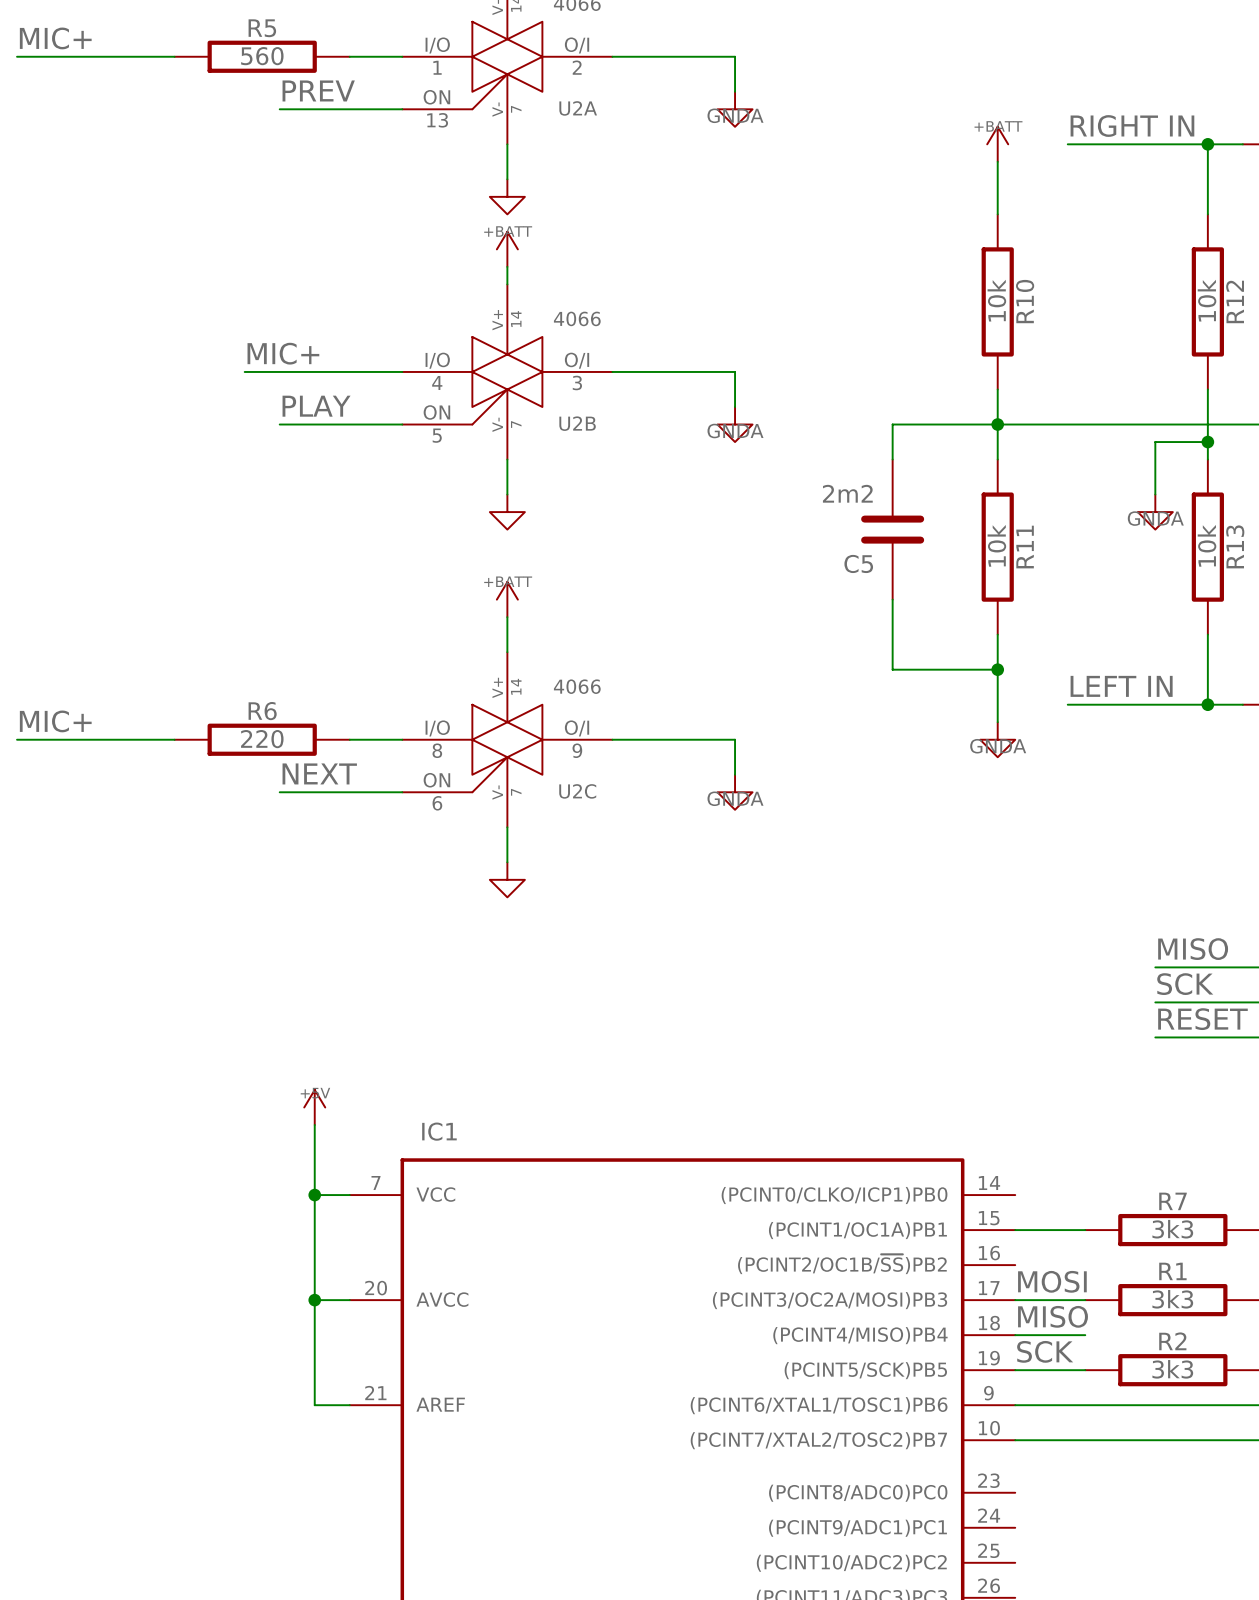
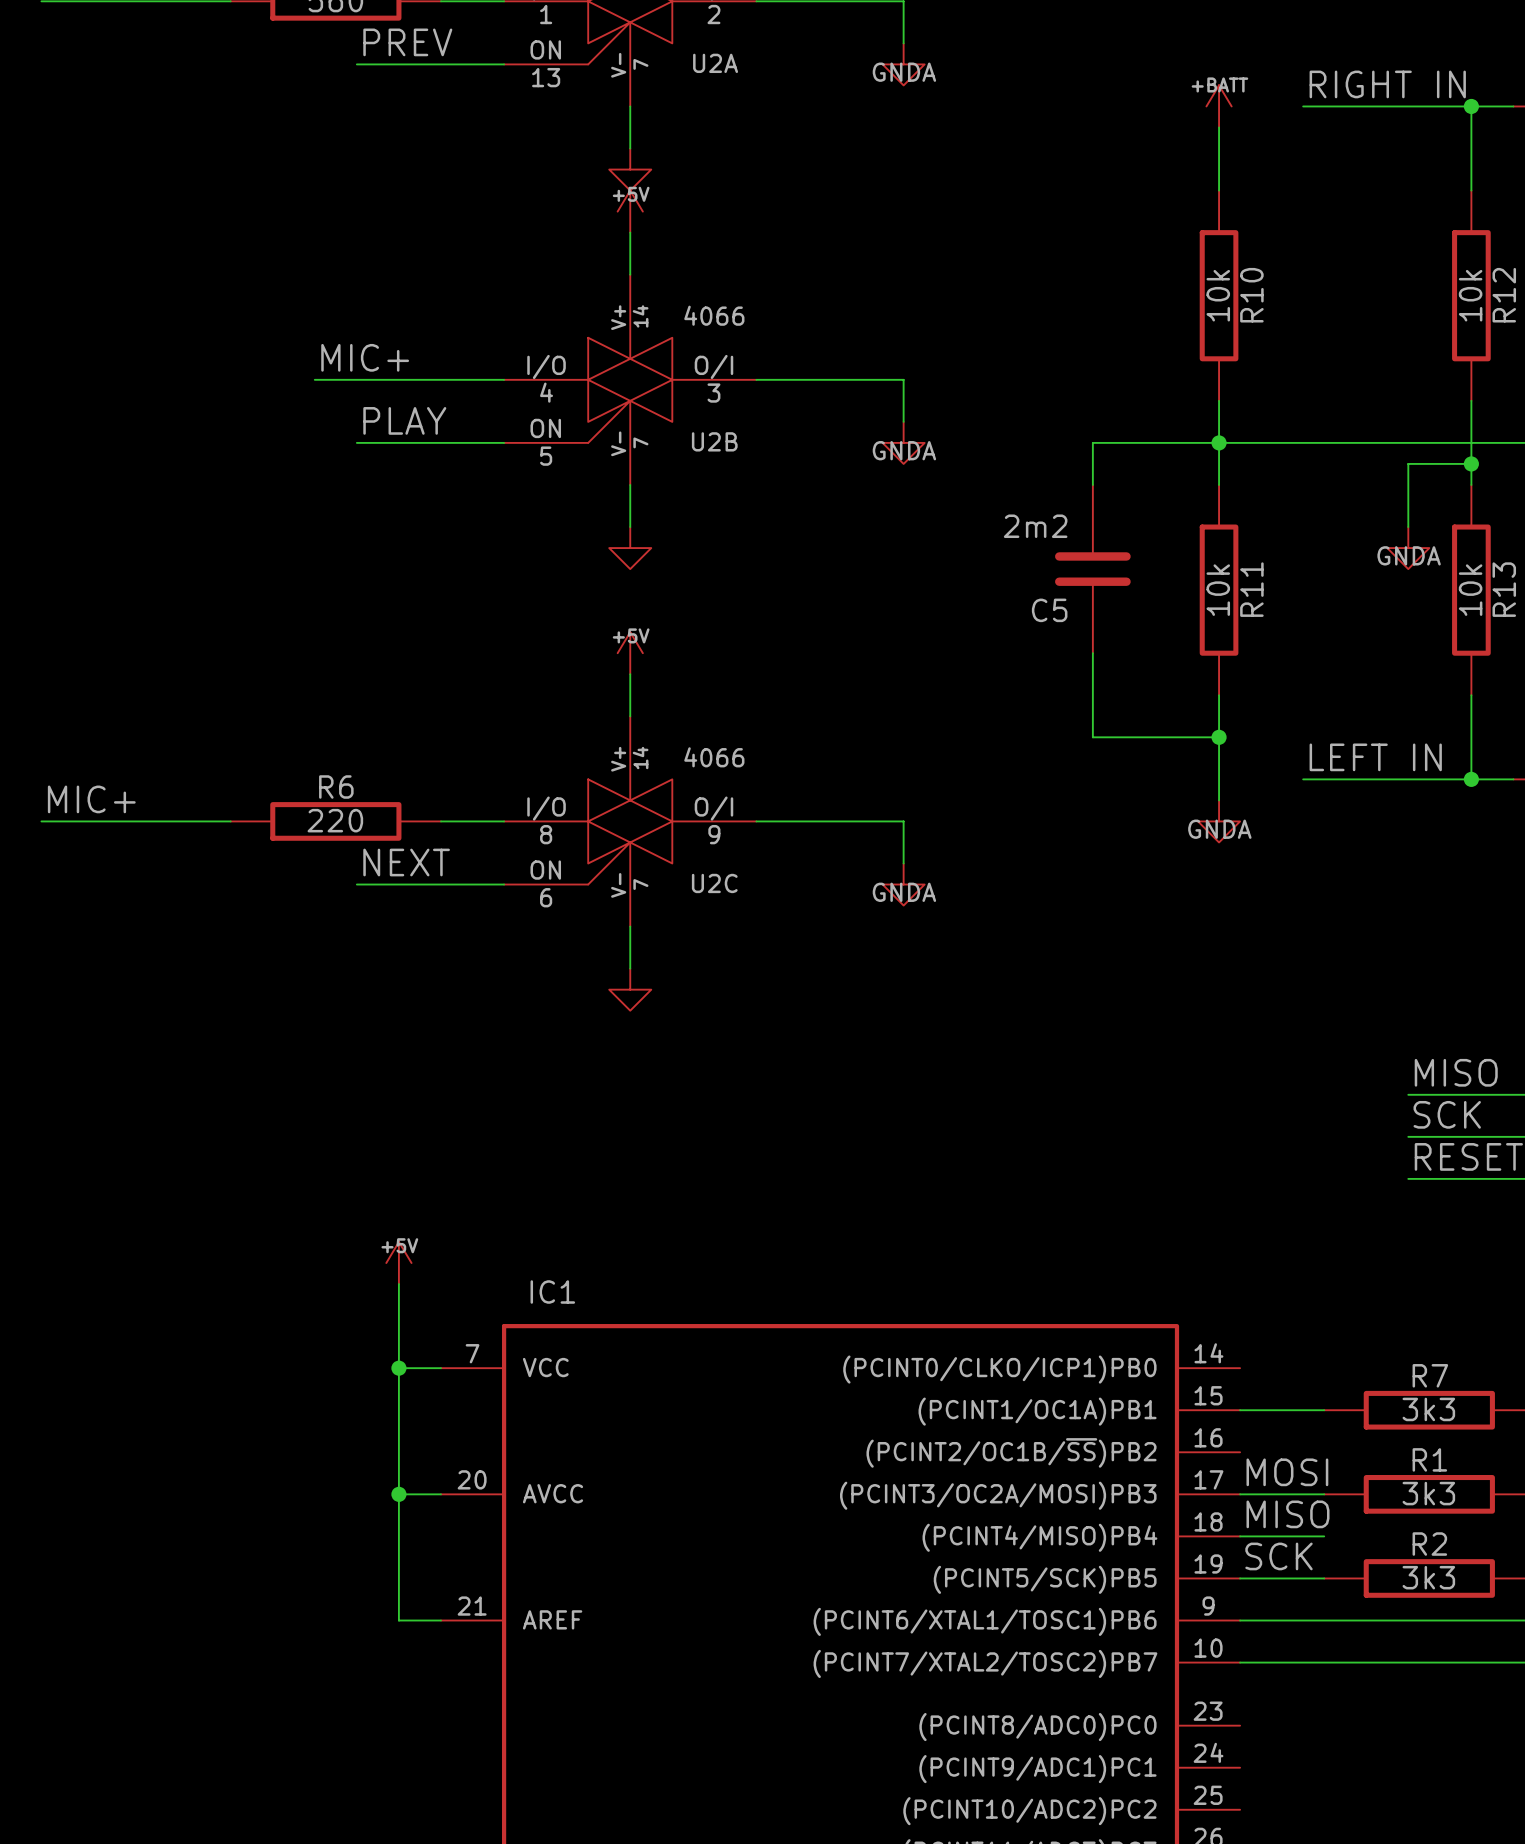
power symbol: none -> +5V (630, 211)
power symbol: +BATT (507, 249) -> none
power symbol: +BATT (507, 599) -> +5V (630, 653)

